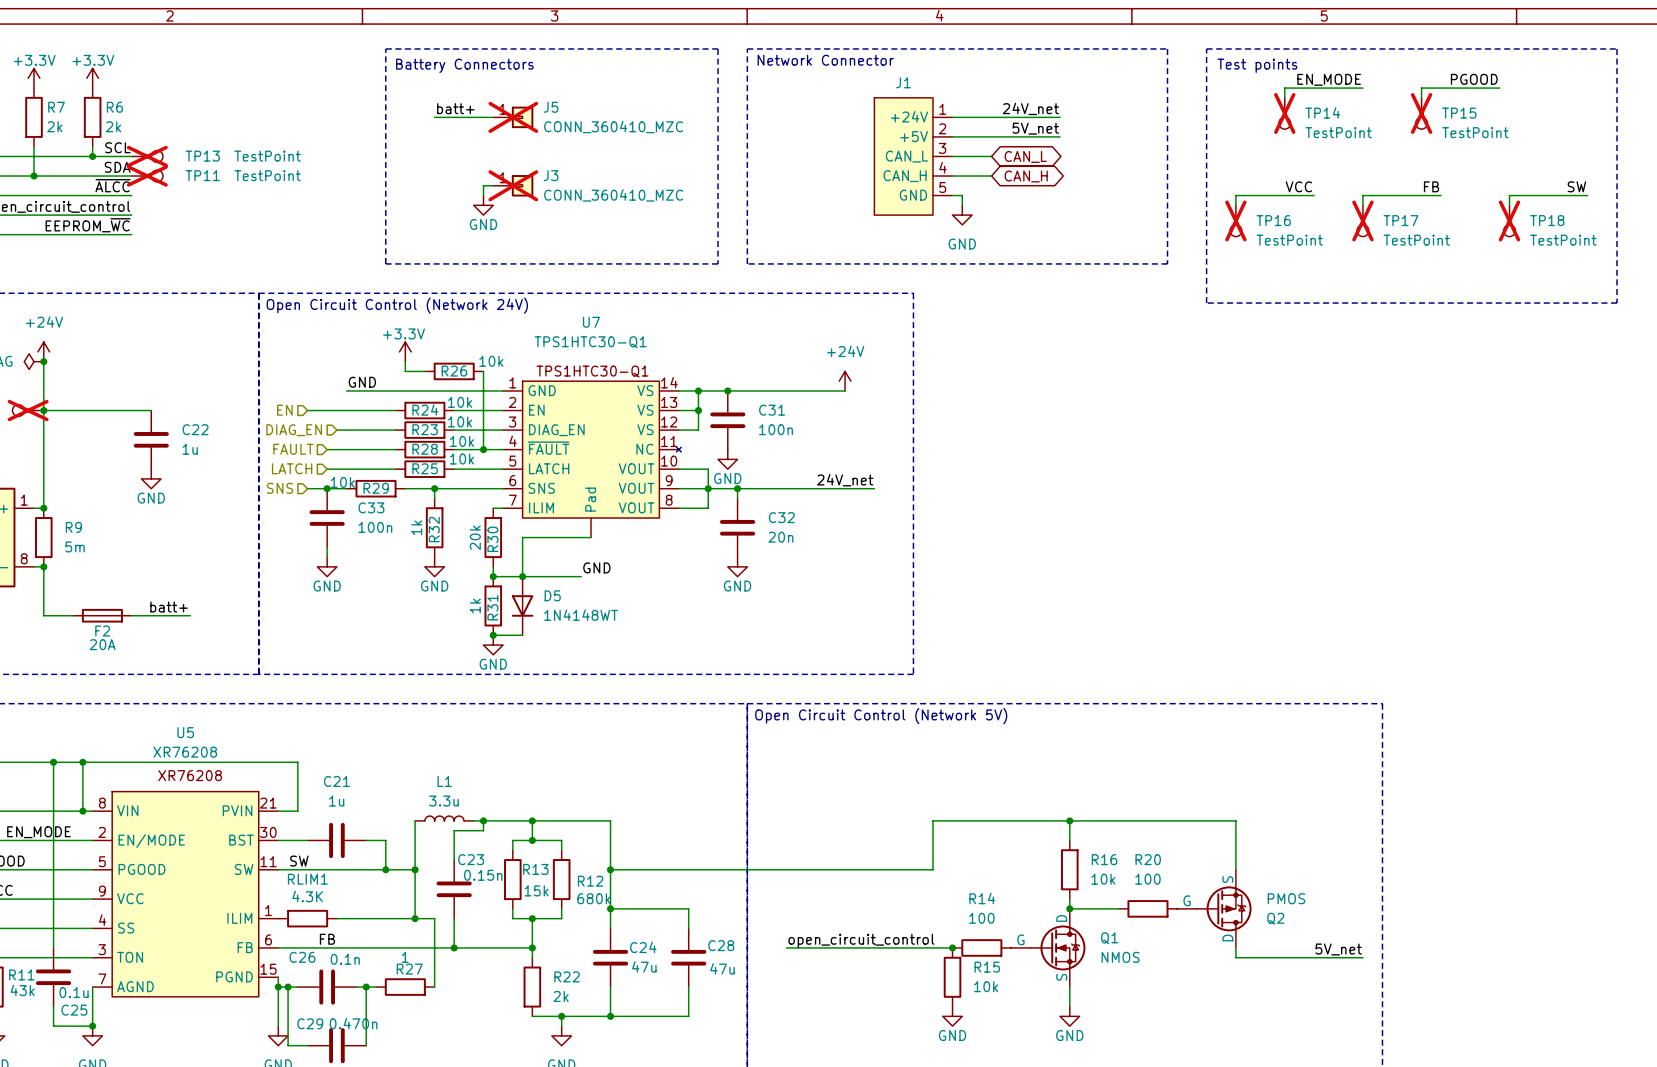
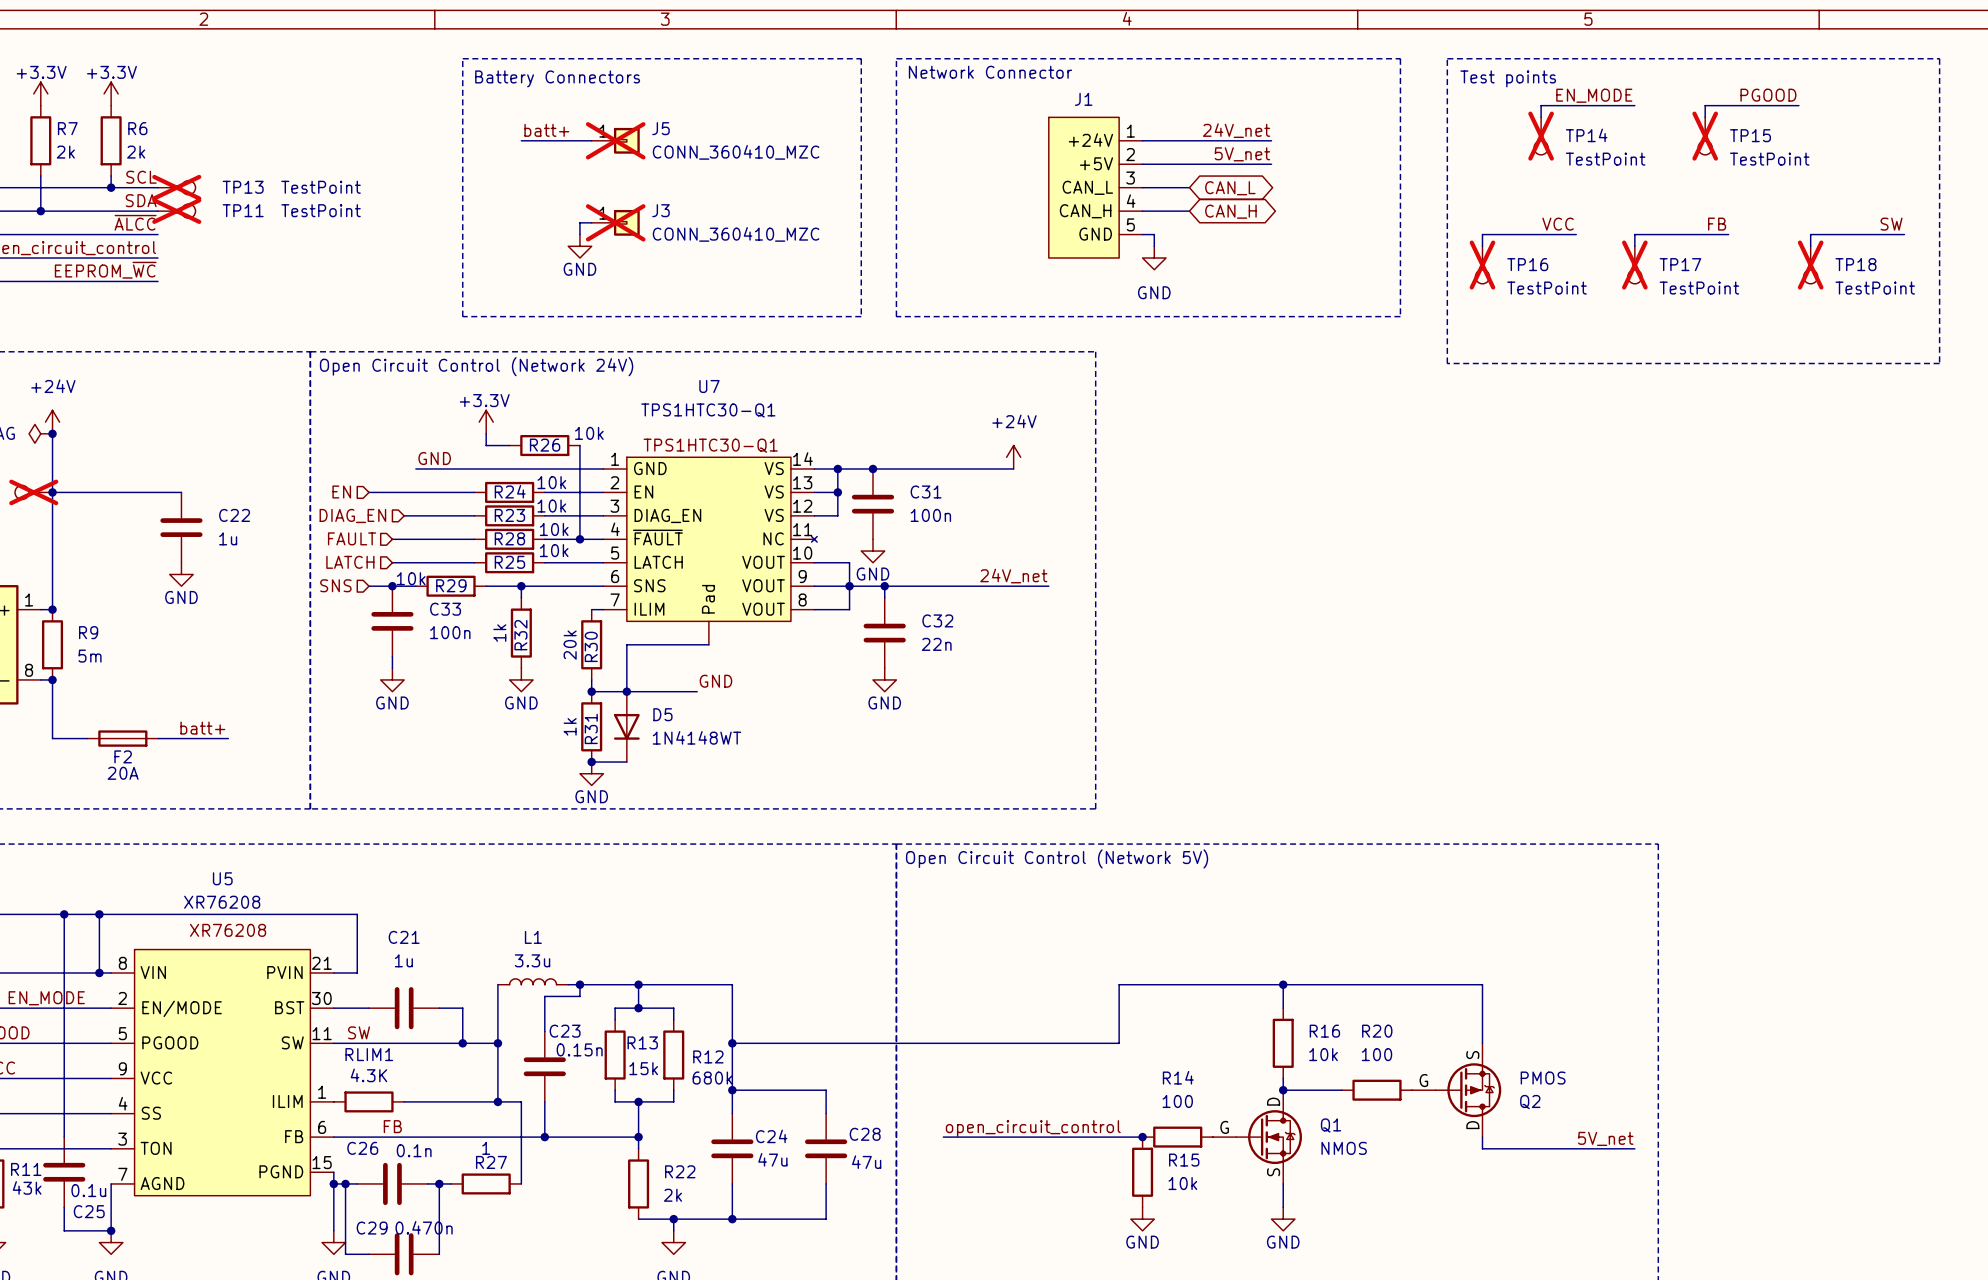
C32 value: 20n (780, 537) -> 22n (936, 644)

